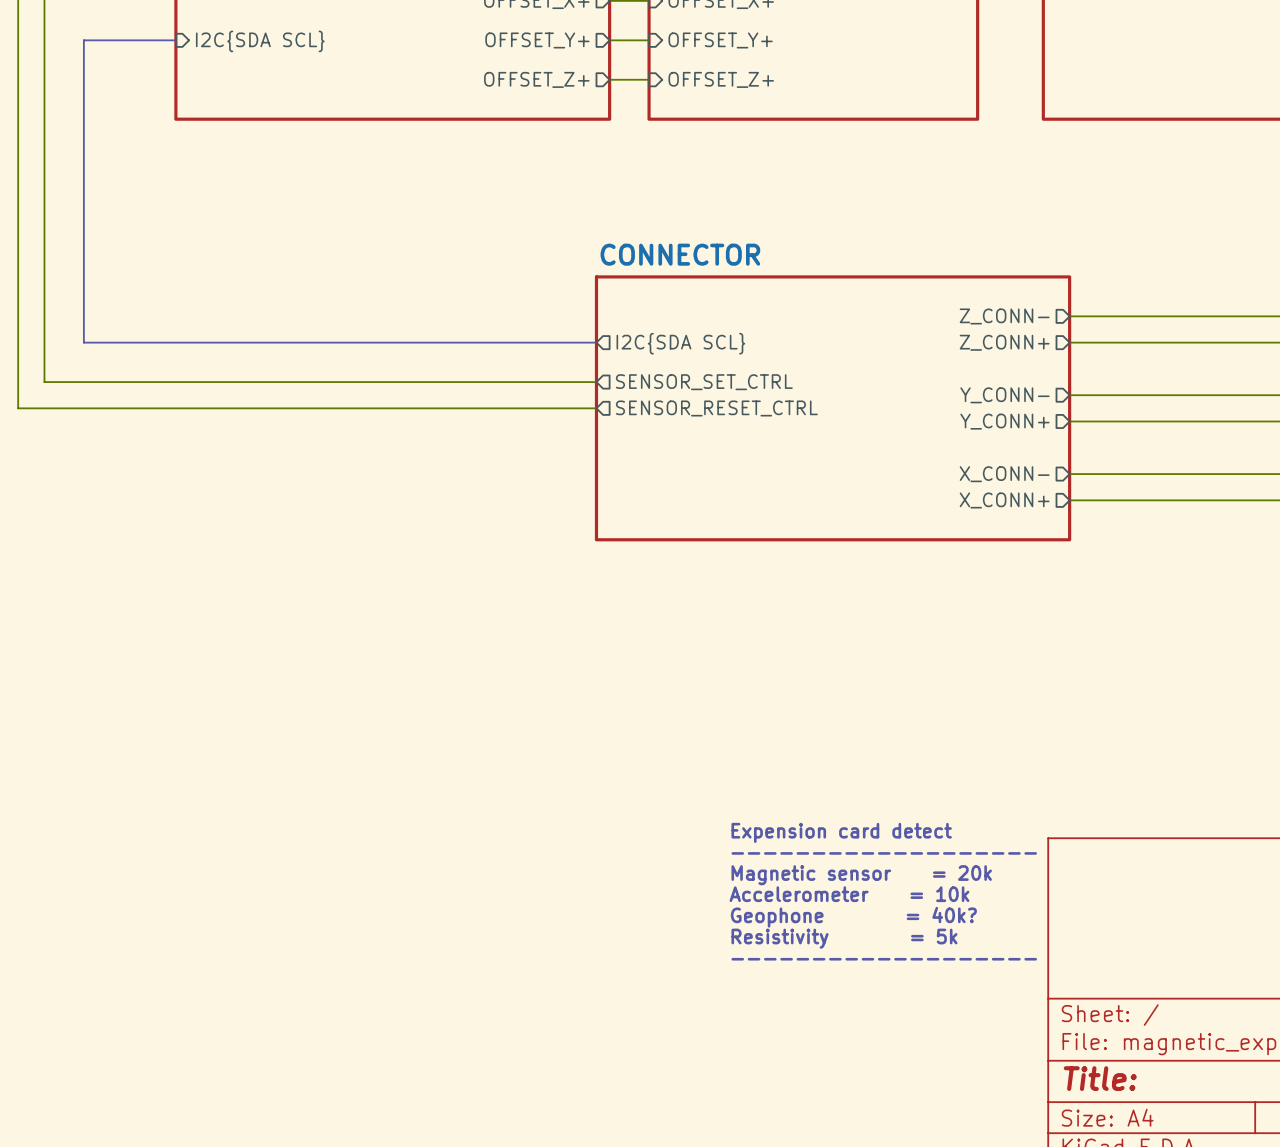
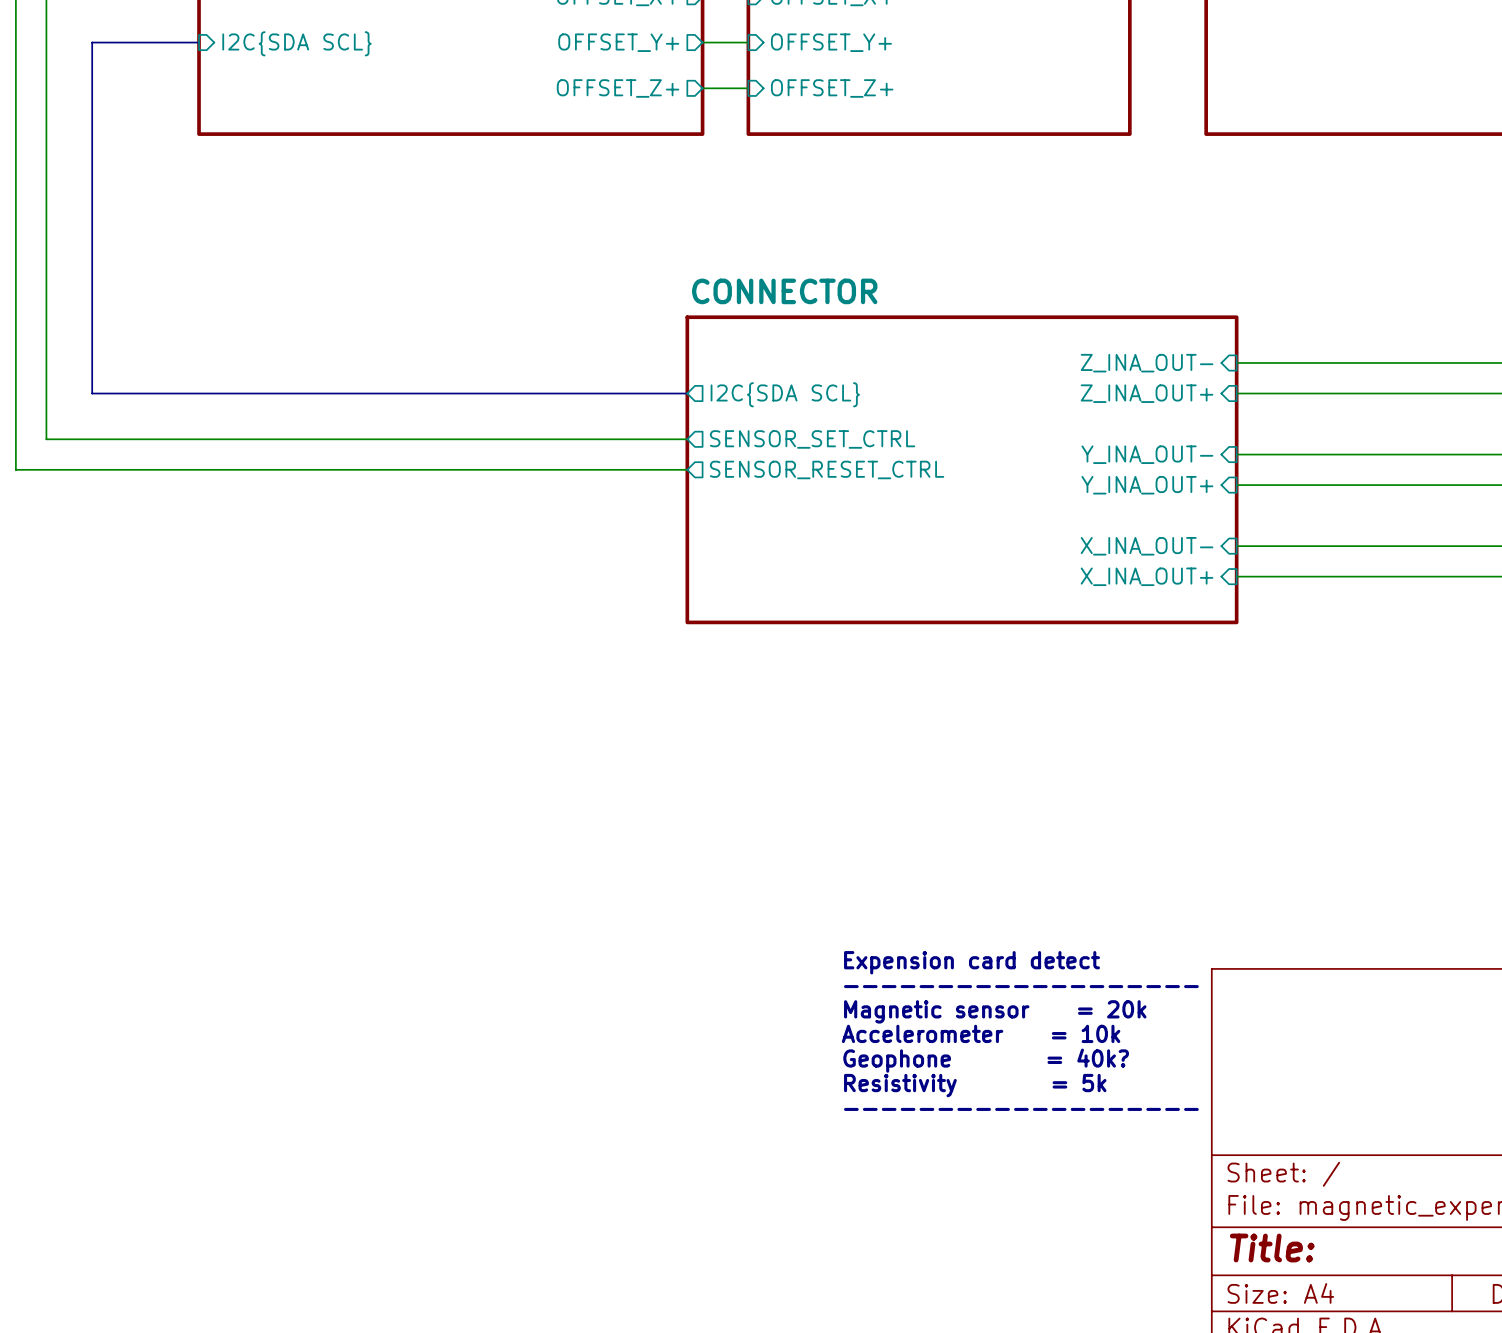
sheet pin shape: output (1004, 316) -> input (1147, 363)
sheet pin: Z_CONN- (1004, 316) -> Z_INA_OUT- (1147, 363)
sheet pin shape: output (1004, 342) -> input (1147, 393)
sheet pin: Z_CONN+ (1004, 342) -> Z_INA_OUT+ (1147, 393)
sheet pin shape: output (1004, 395) -> input (1147, 454)
sheet pin: Y_CONN- (1004, 395) -> Y_INA_OUT- (1147, 454)
sheet pin shape: output (1004, 421) -> input (1147, 485)
sheet pin: Y_CONN+ (1004, 421) -> Y_INA_OUT+ (1147, 485)
sheet pin shape: output (1004, 474) -> input (1147, 546)
sheet pin: X_CONN- (1004, 474) -> X_INA_OUT- (1147, 546)
sheet pin shape: output (1004, 500) -> input (1147, 576)
sheet pin: X_CONN+ (1004, 500) -> X_INA_OUT+ (1147, 576)

